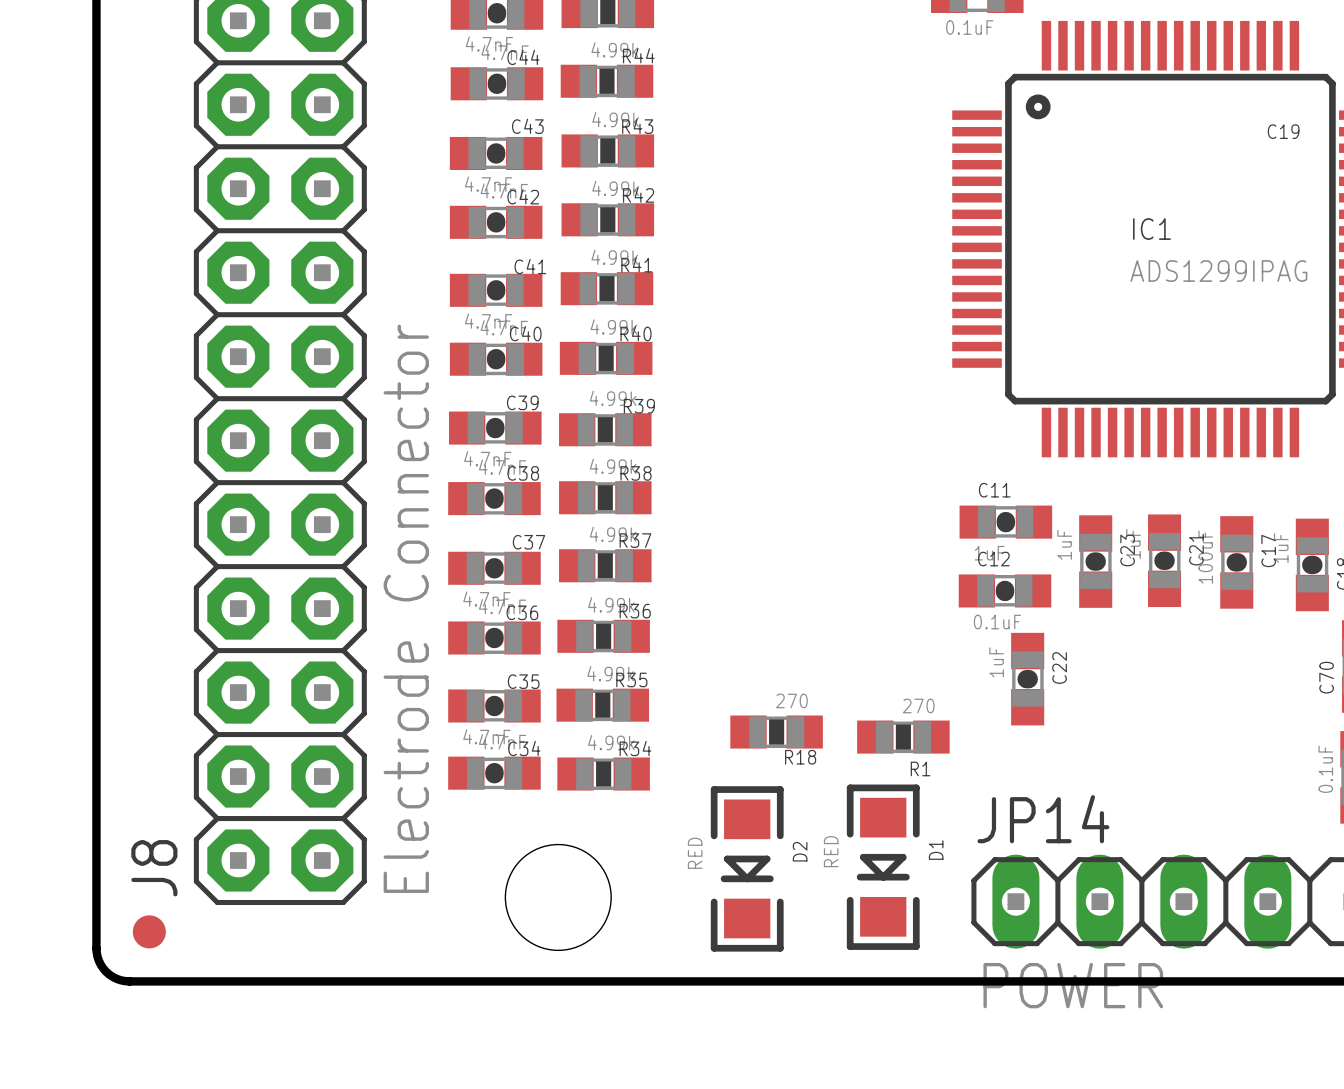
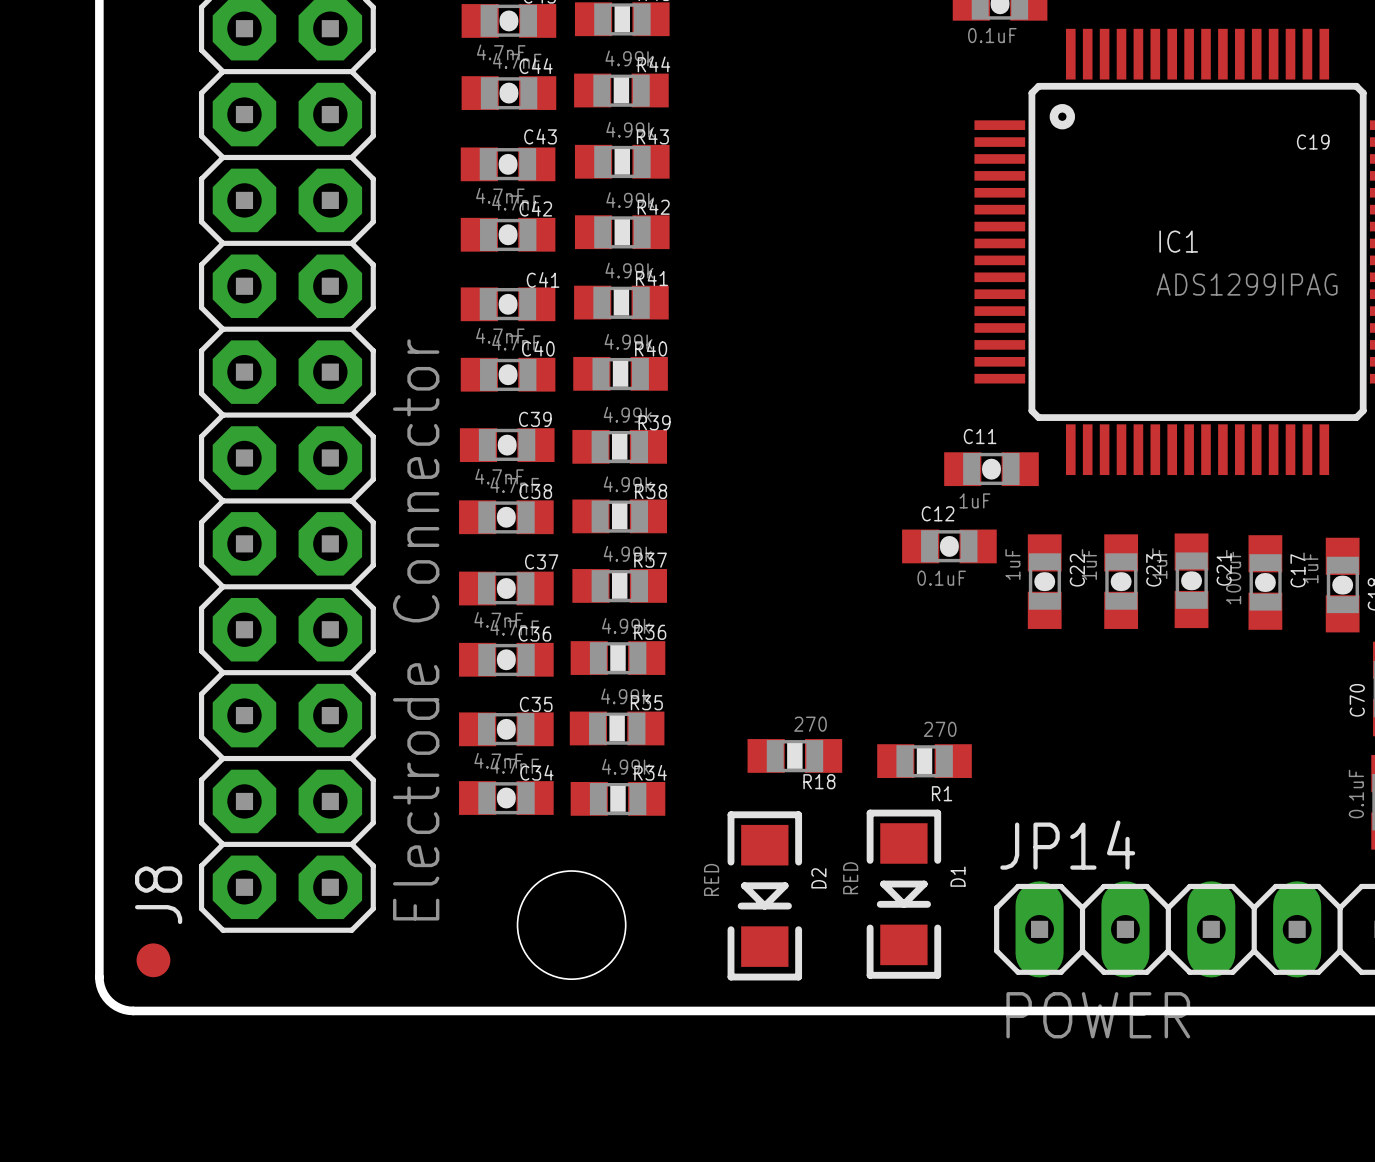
C11 position: (1005, 522) -> (991, 469)
C12 position: (1005, 590) -> (949, 546)
C22 position: (1027, 679) -> (1044, 581)

